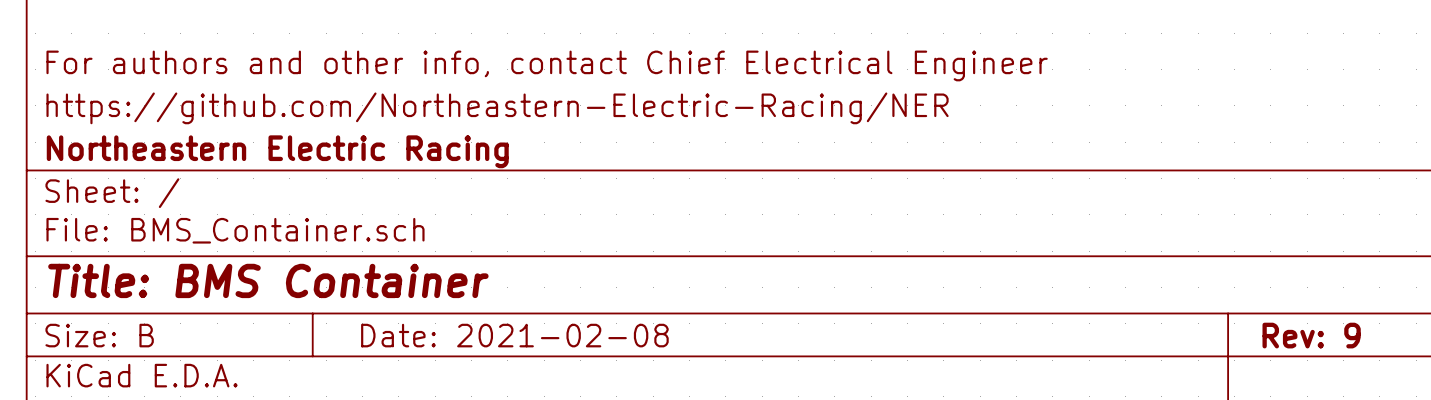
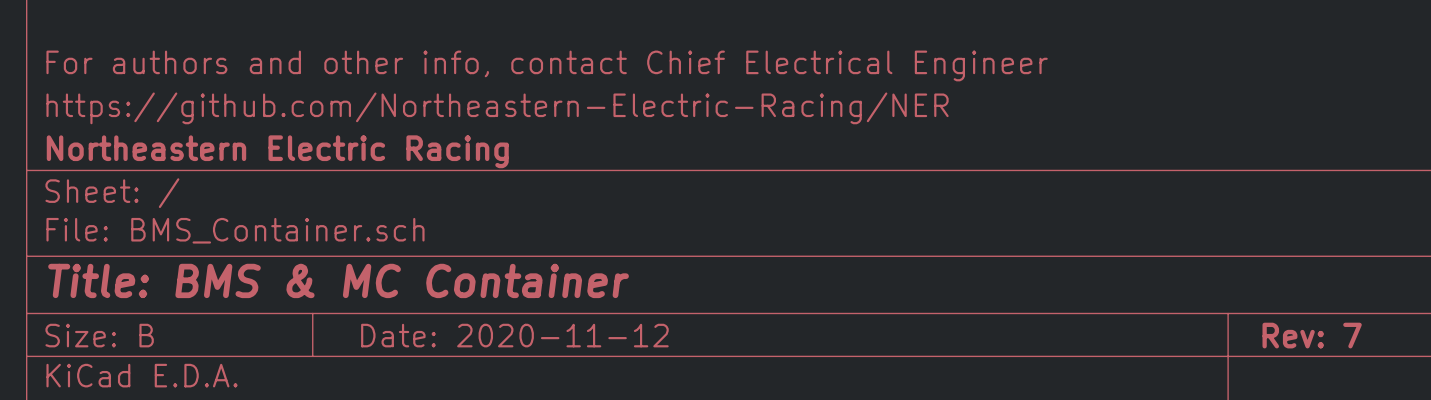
title block: Title: BMS Container (268, 280) -> Title: BMS & MC Container (338, 280)
title block: Date: 2021-02-08 (514, 335) -> Date: 2020-11-12 (514, 335)
title block: Rev: 9 (1311, 335) -> Rev: 7 (1312, 335)

